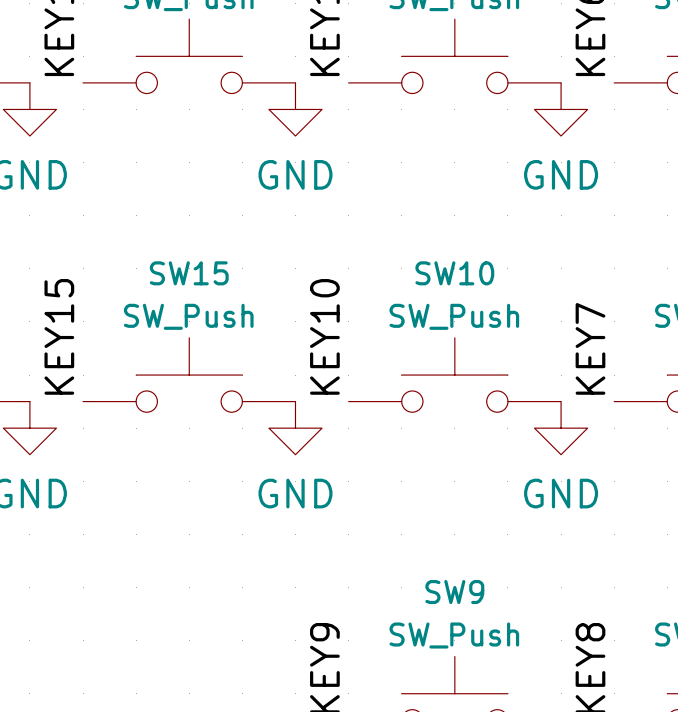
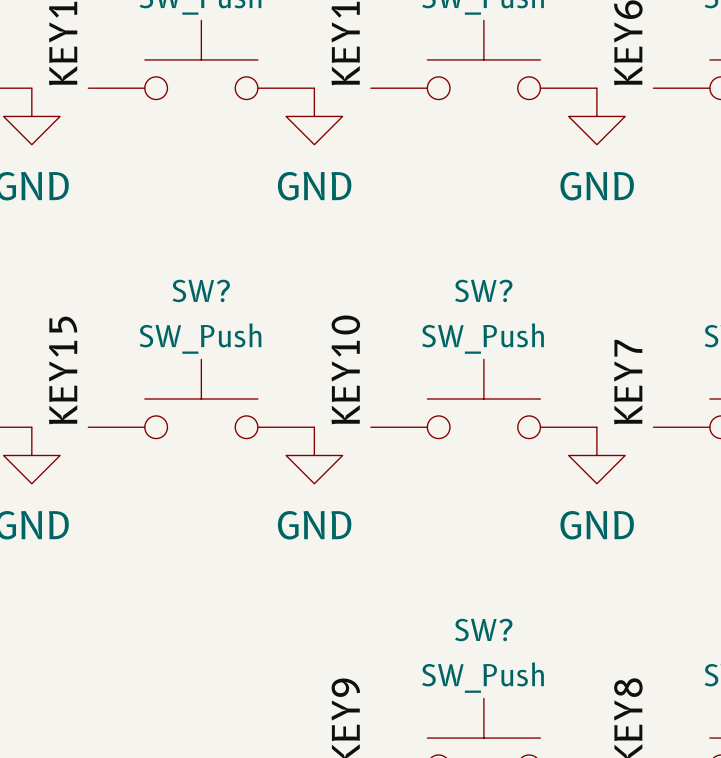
SW15 name: SW15 (189, 273) -> SW? (201, 290)
SW10 name: SW10 (454, 273) -> SW? (483, 290)
SW9 name: SW9 (454, 592) -> SW? (483, 629)

